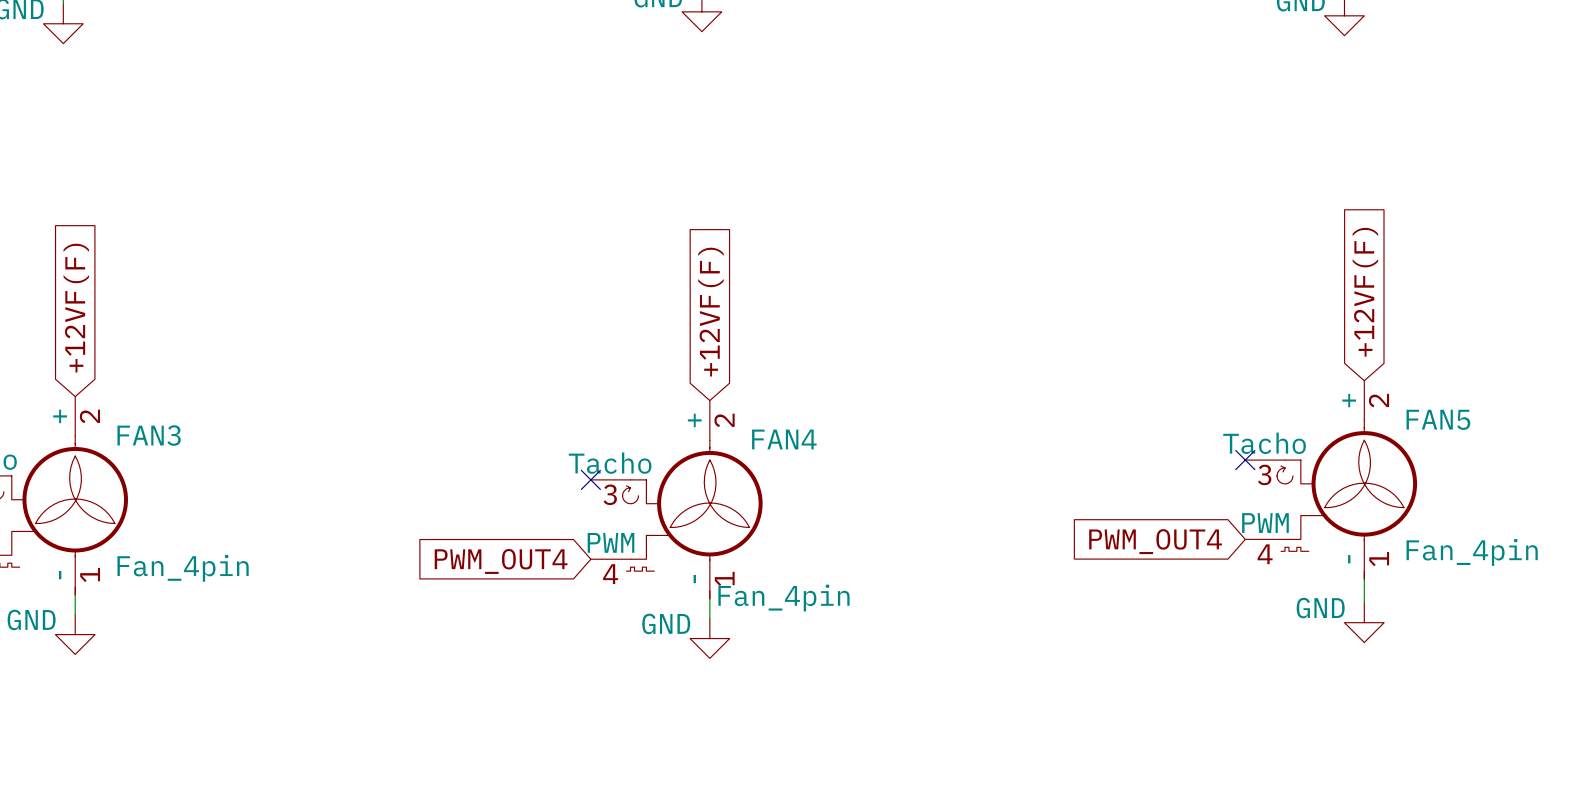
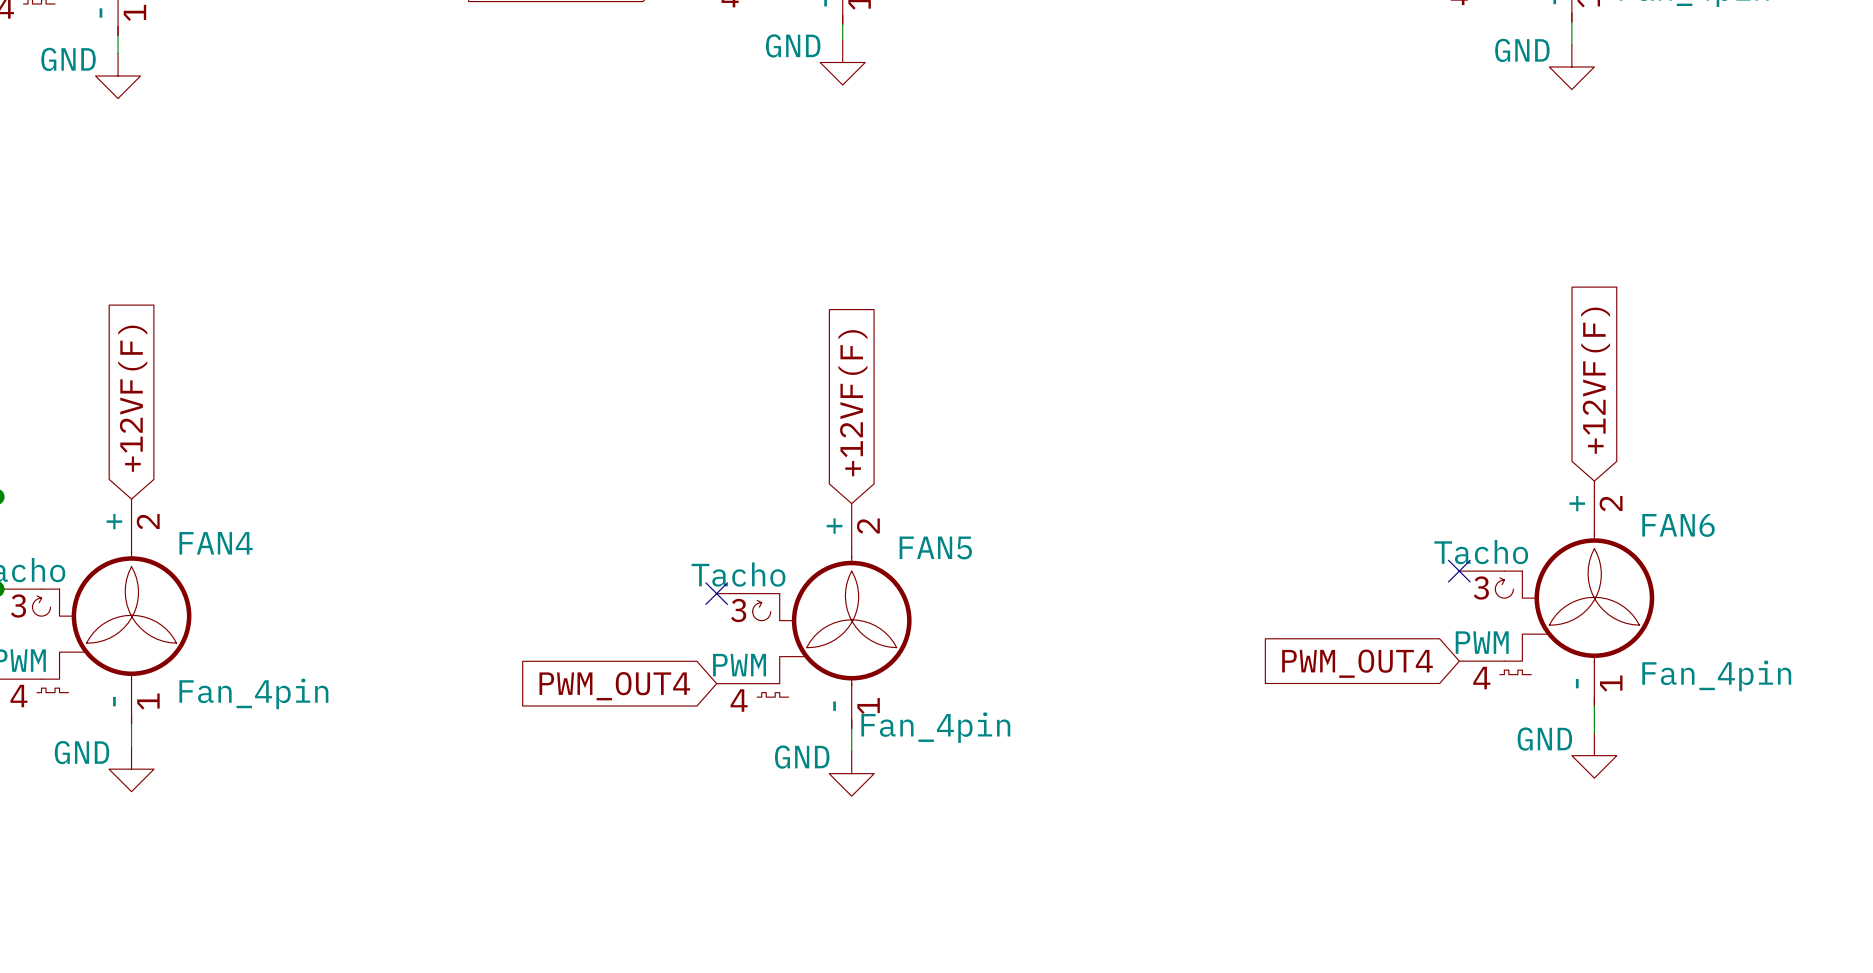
FAN5 name: FAN5 (1438, 419) -> FAN6 (1678, 525)
FAN3 name: FAN3 (149, 435) -> FAN4 (216, 543)
FAN4 name: FAN4 (784, 439) -> FAN5 (935, 547)

